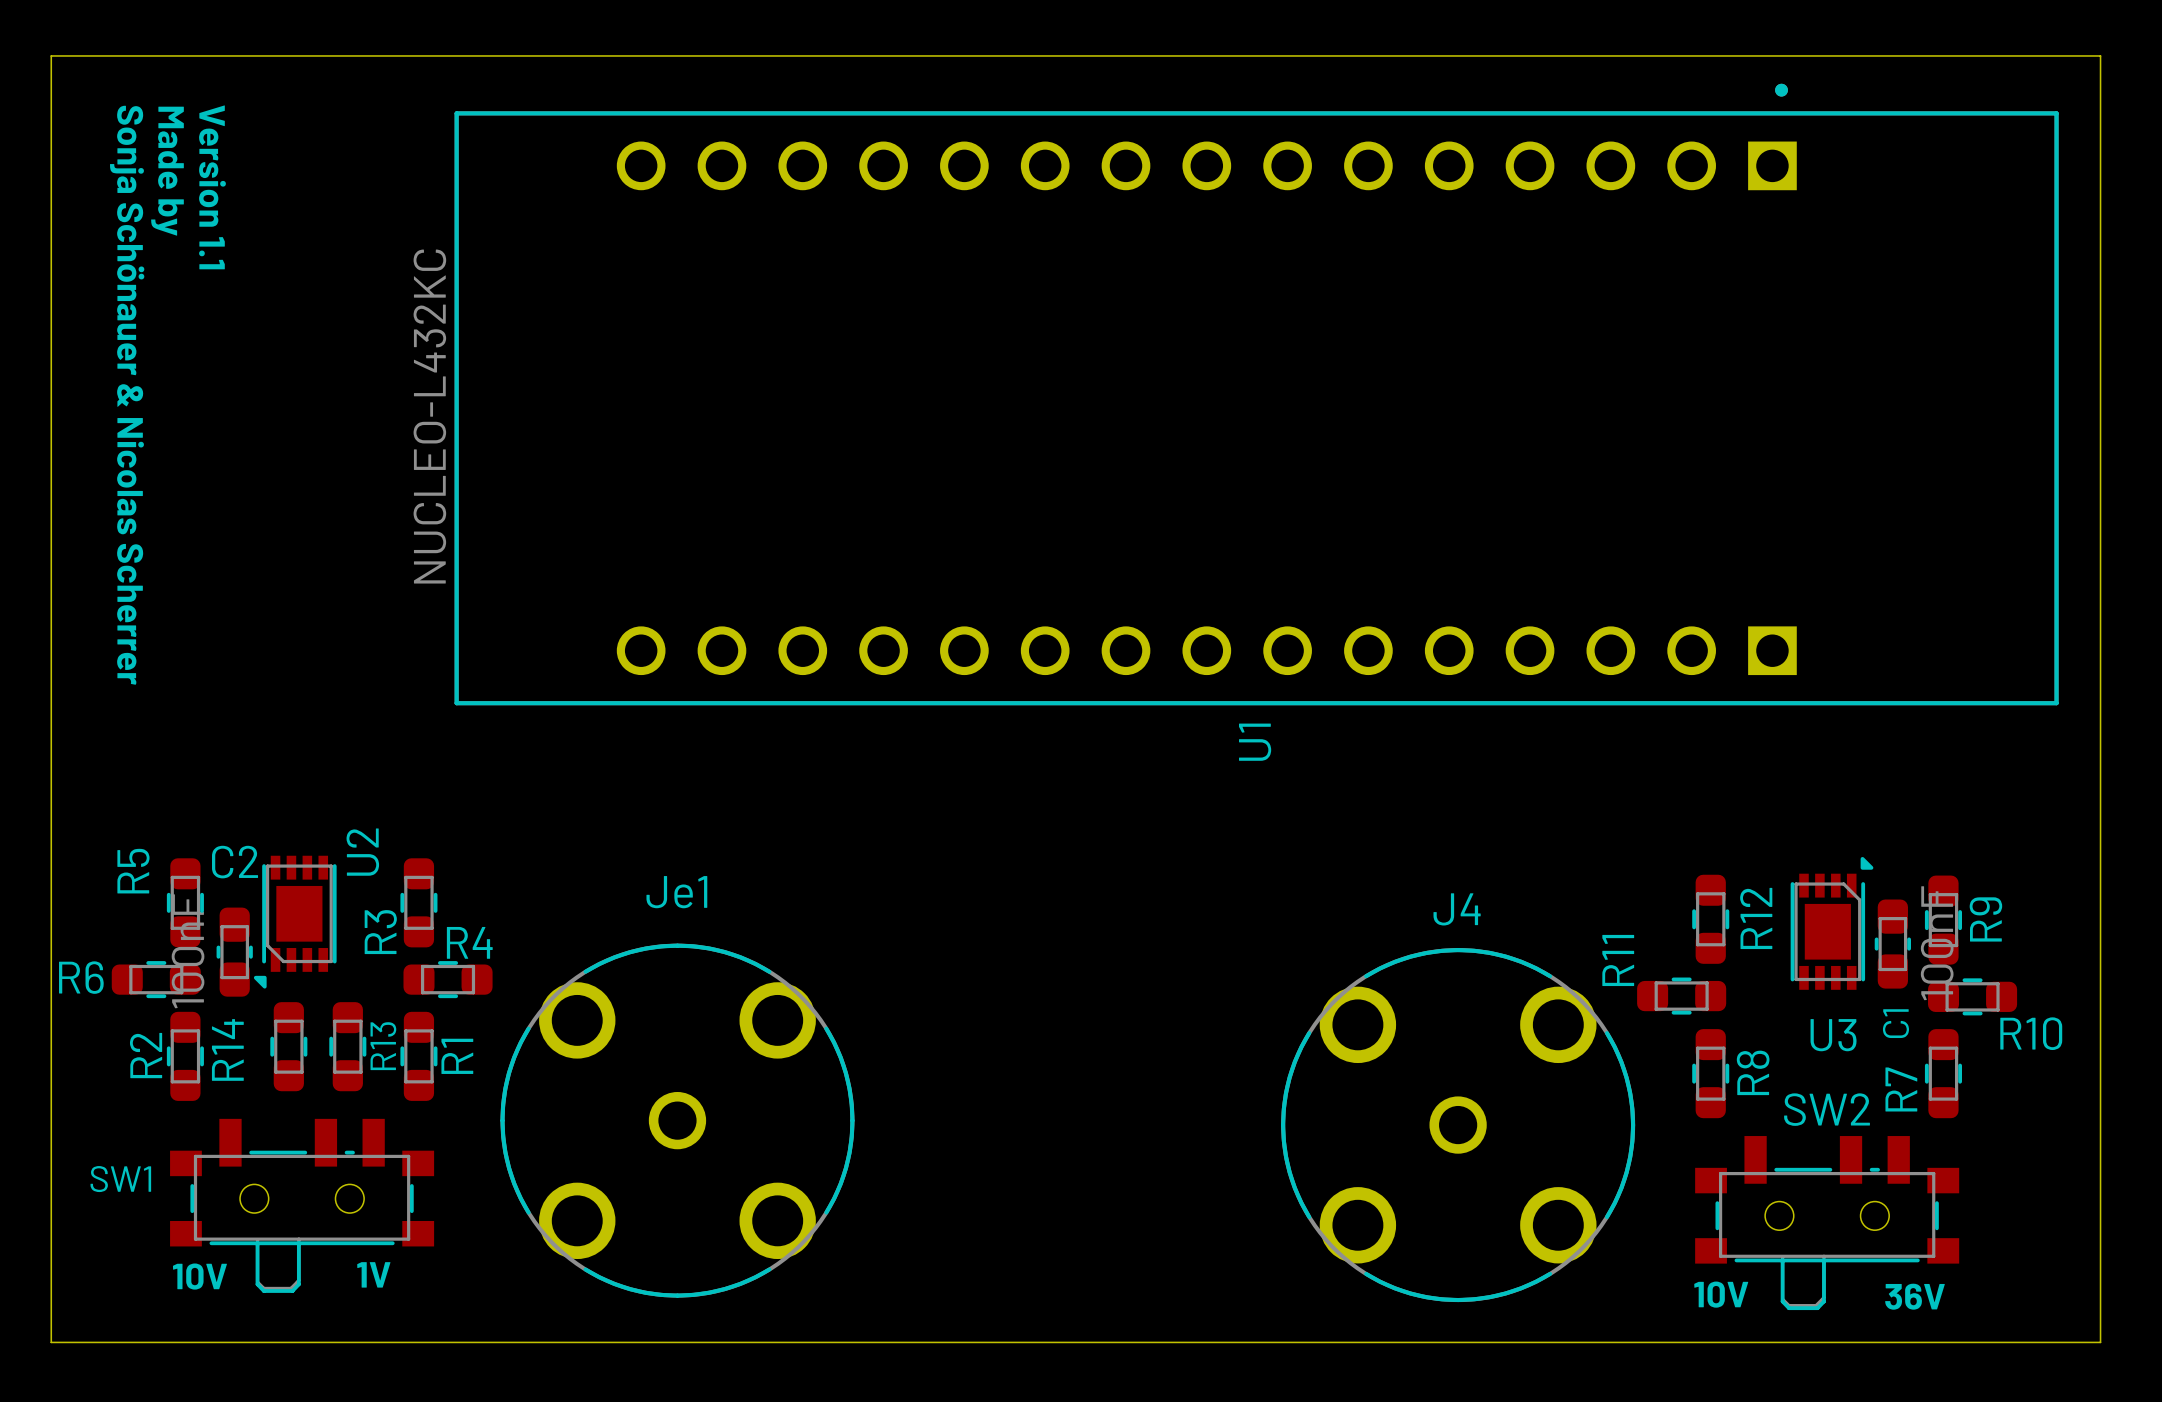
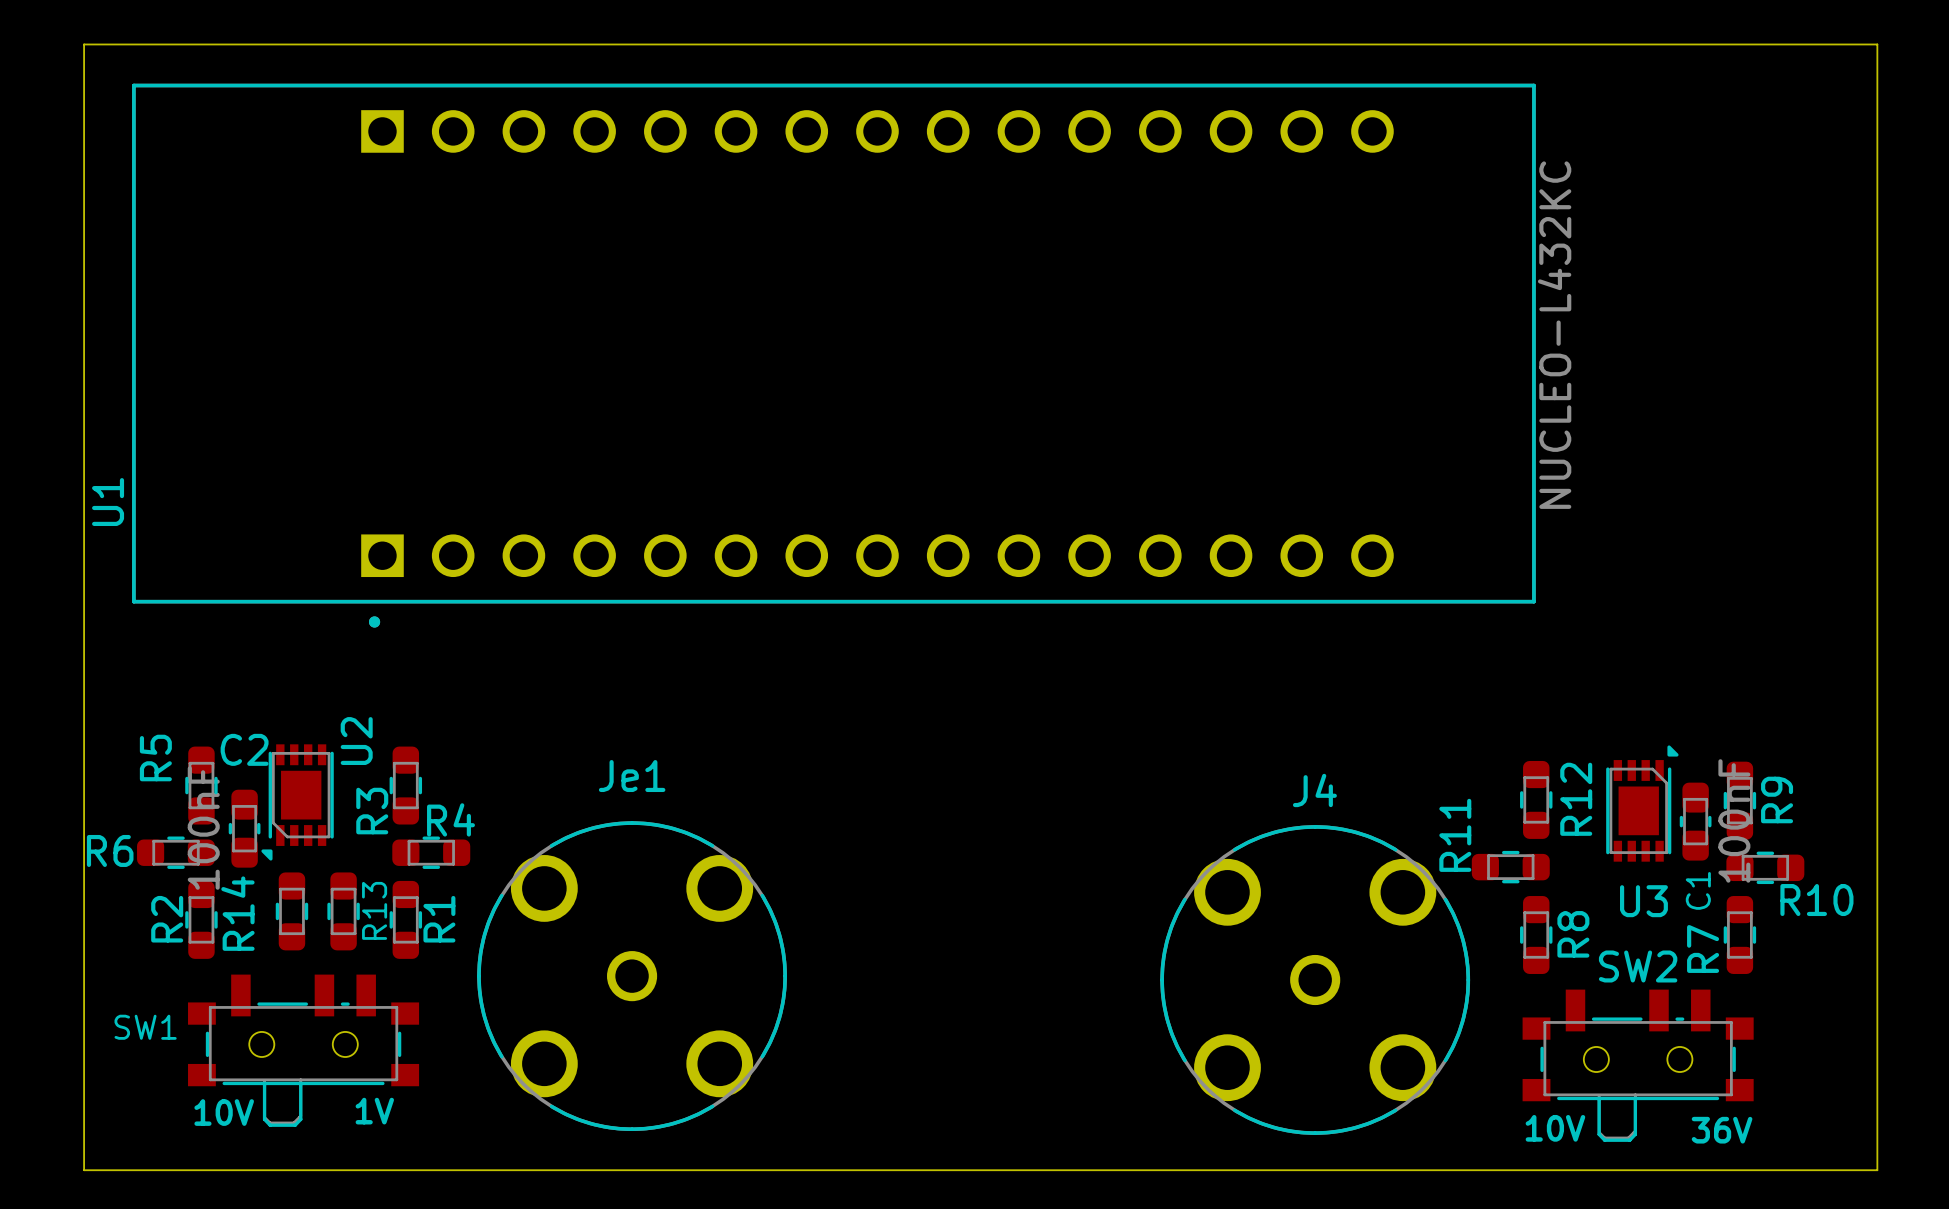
text: Made by (167, 171) -> none
text: Version 1.1 (212, 187) -> none
U1 rotation: 0° (1256, 394) -> 180° (833, 355)
text: Sonja Schönauer & Nicolas Scherrer (127, 395) -> none
U1 name position: U1 (1255, 742) -> U1 (108, 502)

